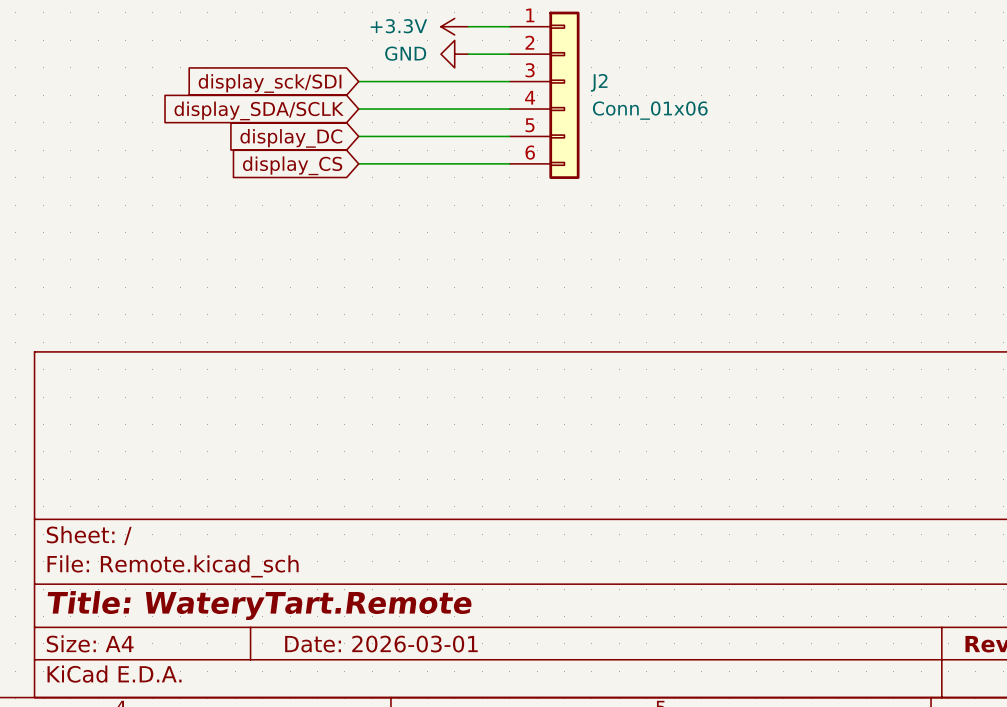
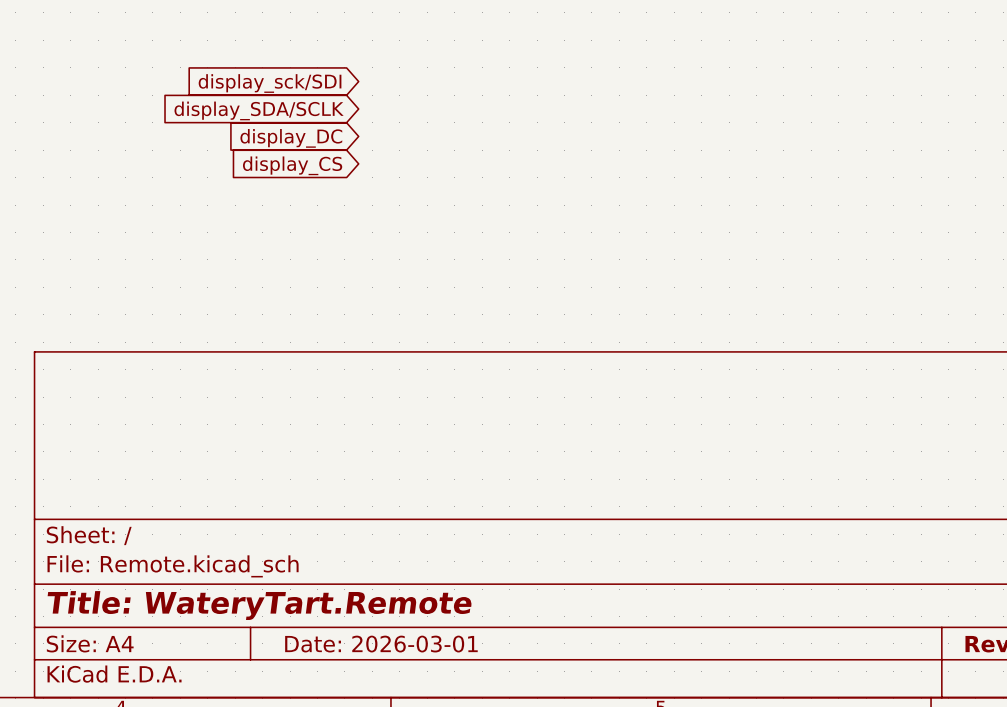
power symbol: +3.3V (454, 26) -> none
wire: (468, 26) (509, 26) -> none
power symbol: GND (454, 54) -> none
wire: (468, 54) (509, 54) -> none
wire: (358, 81) (509, 81) -> none
J2: Conn_01x06 (544, 95) -> none
wire: (358, 109) (509, 109) -> none
wire: (358, 136) (509, 136) -> none
wire: (358, 163) (509, 163) -> none

